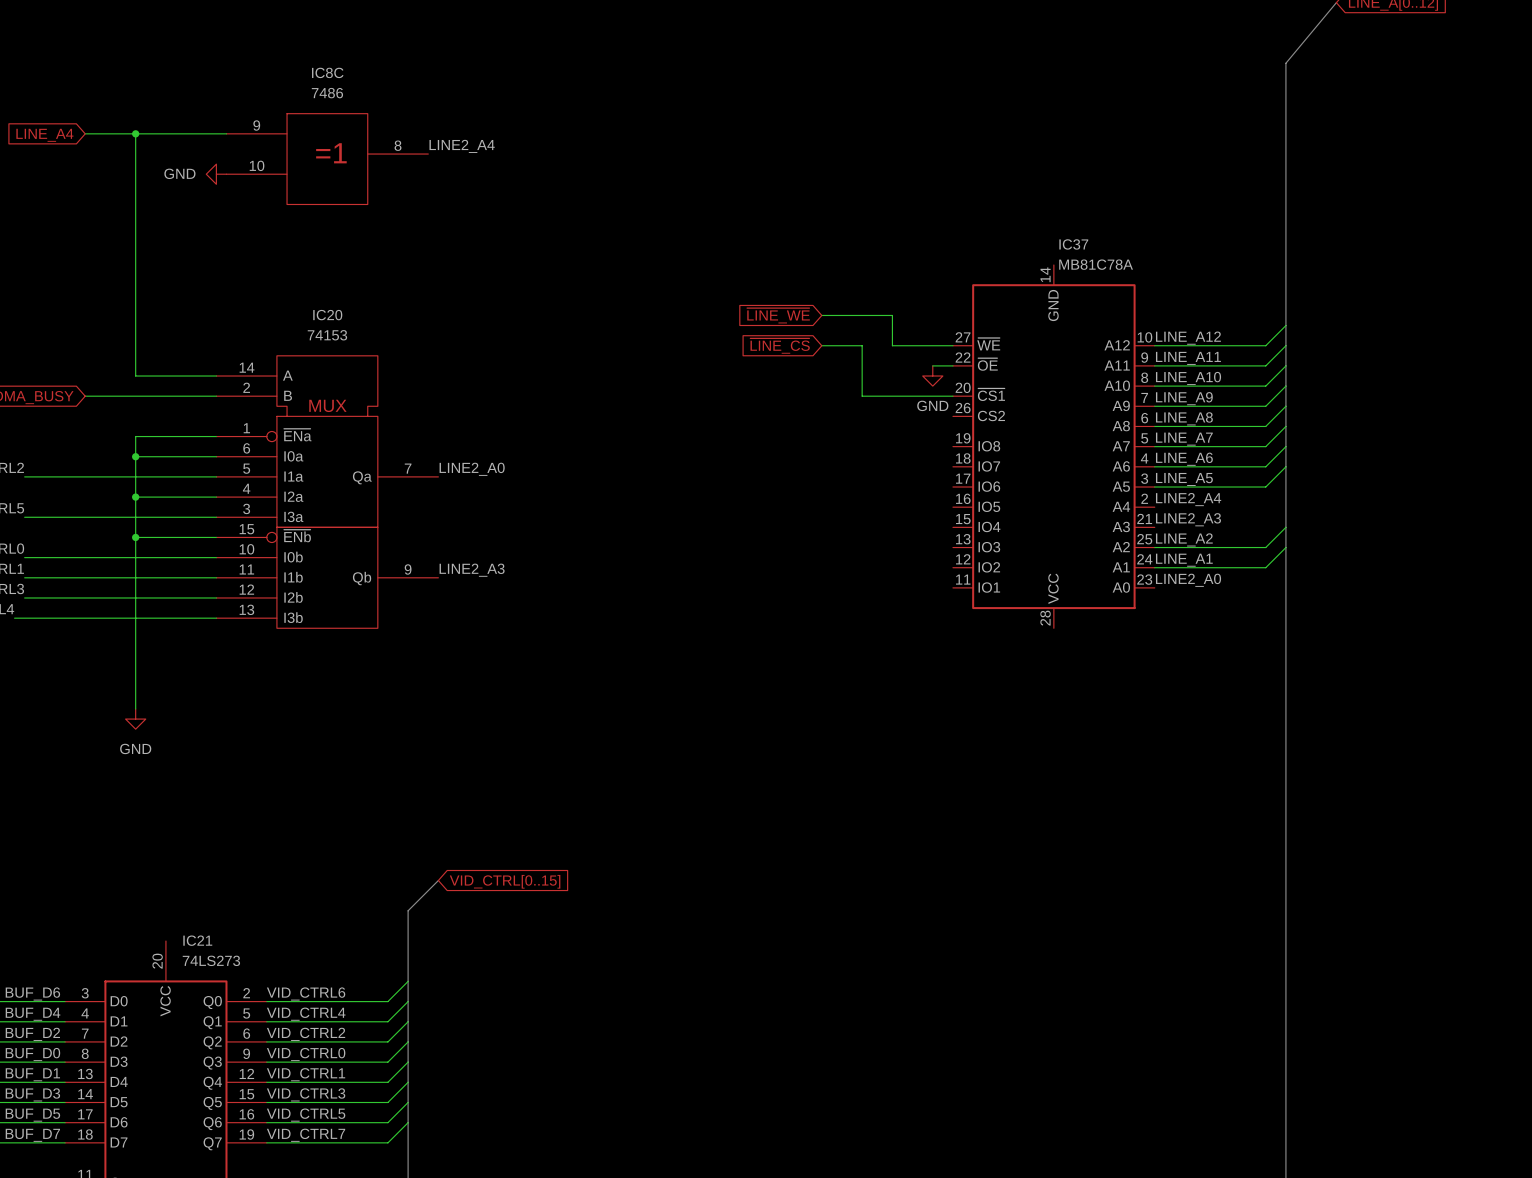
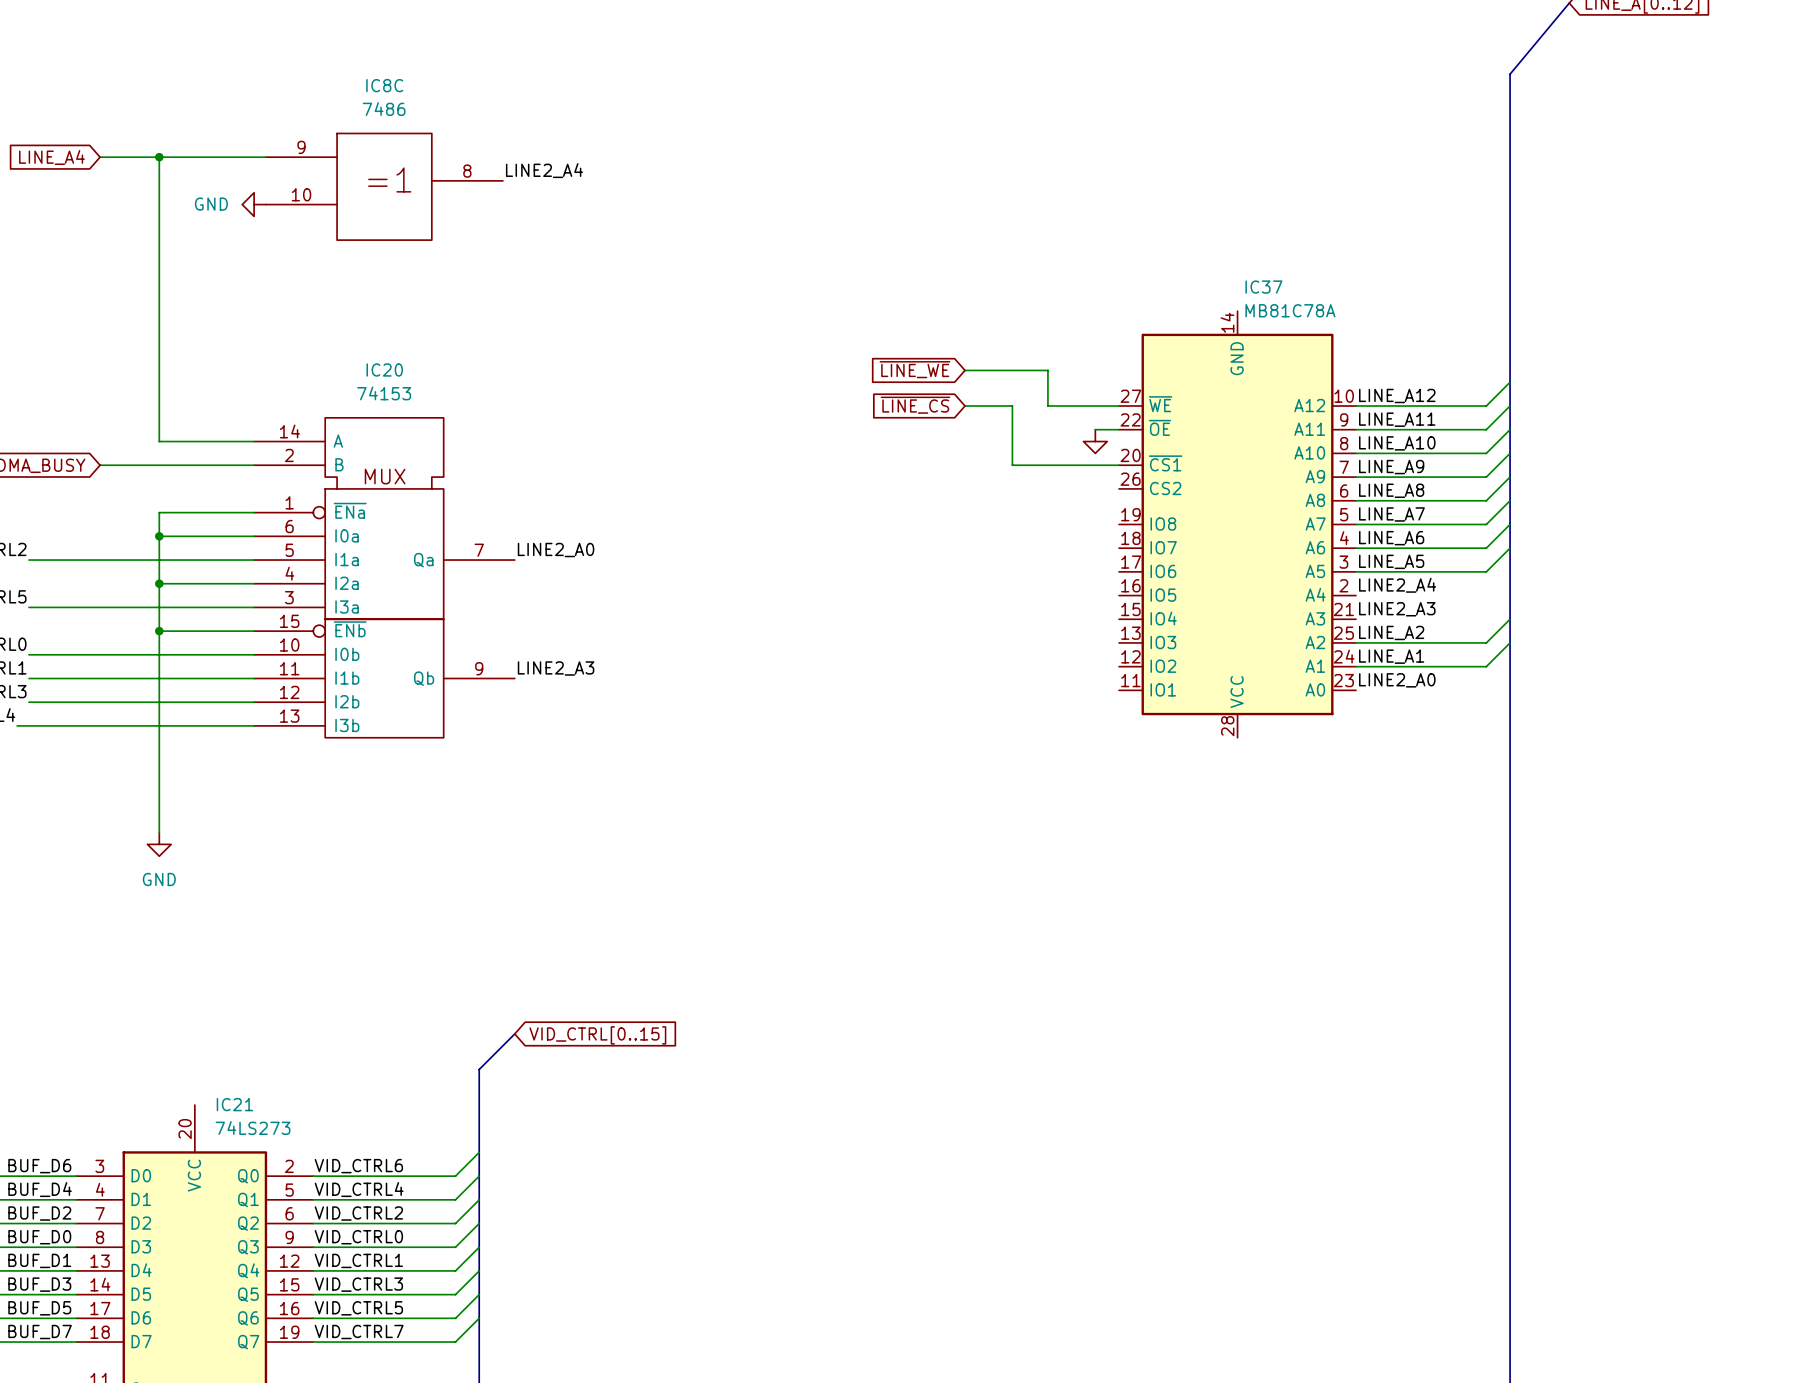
power symbol text: GND (932, 405) -> none

